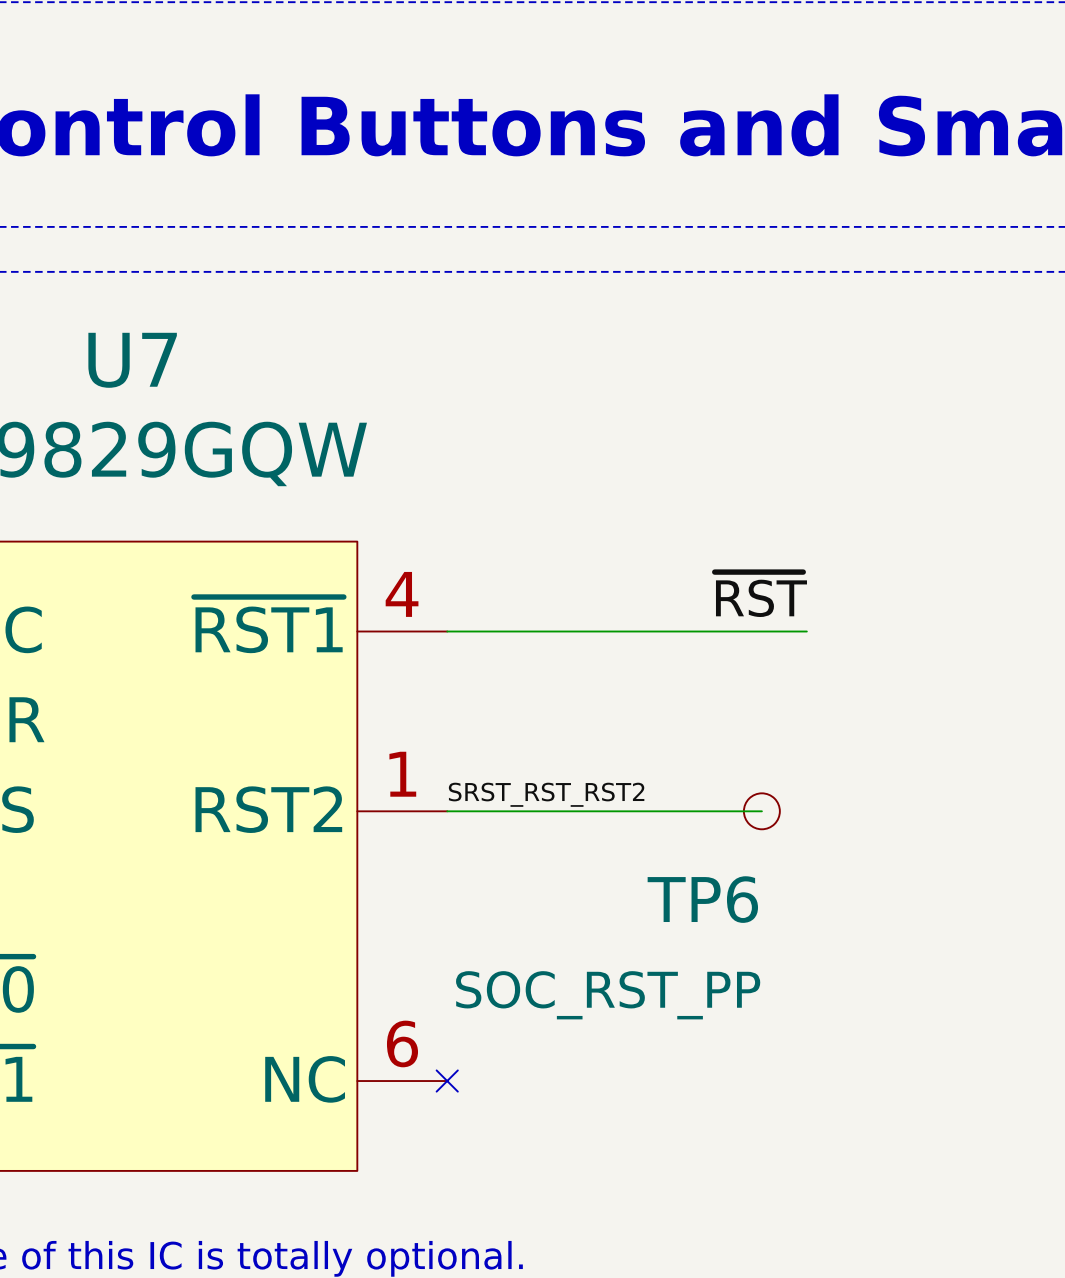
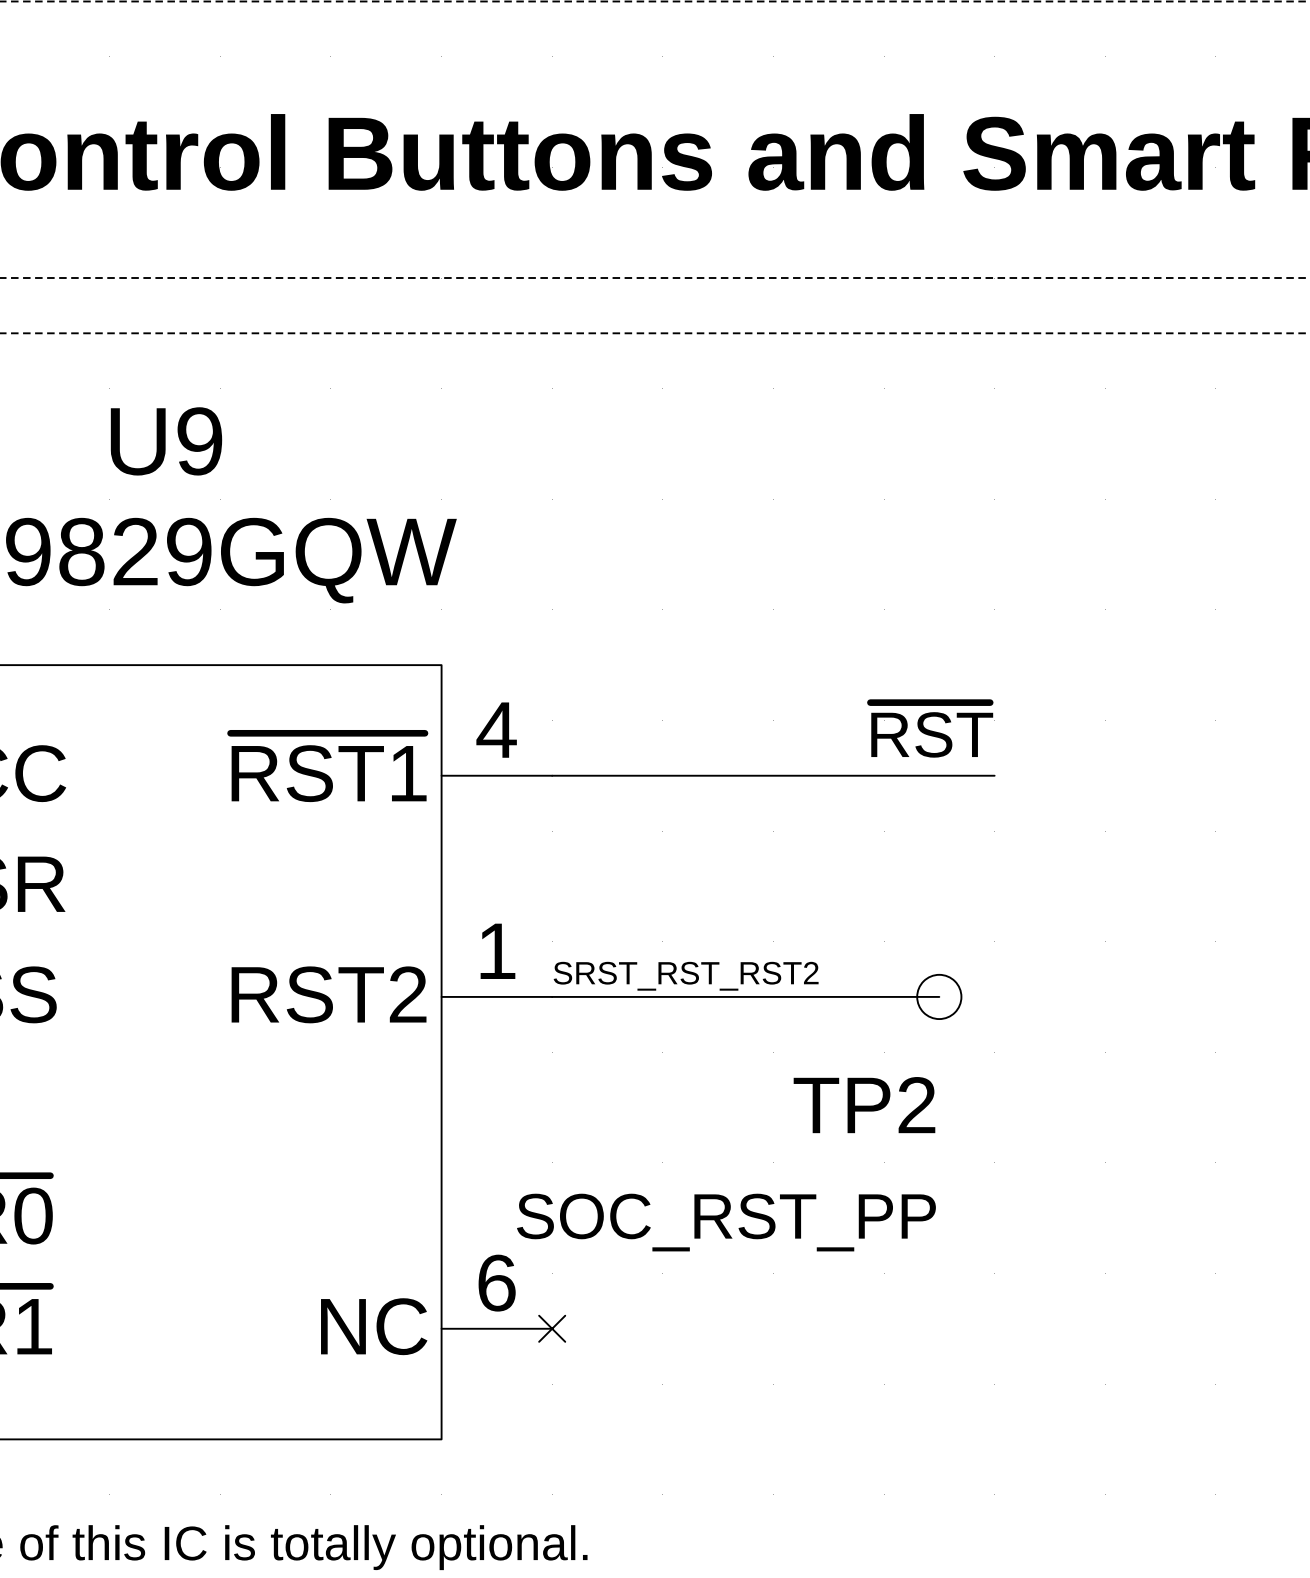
U7 name: U7 (132, 360) -> U9 (166, 441)
TP6 name: TP6 (702, 899) -> TP2 (864, 1105)

